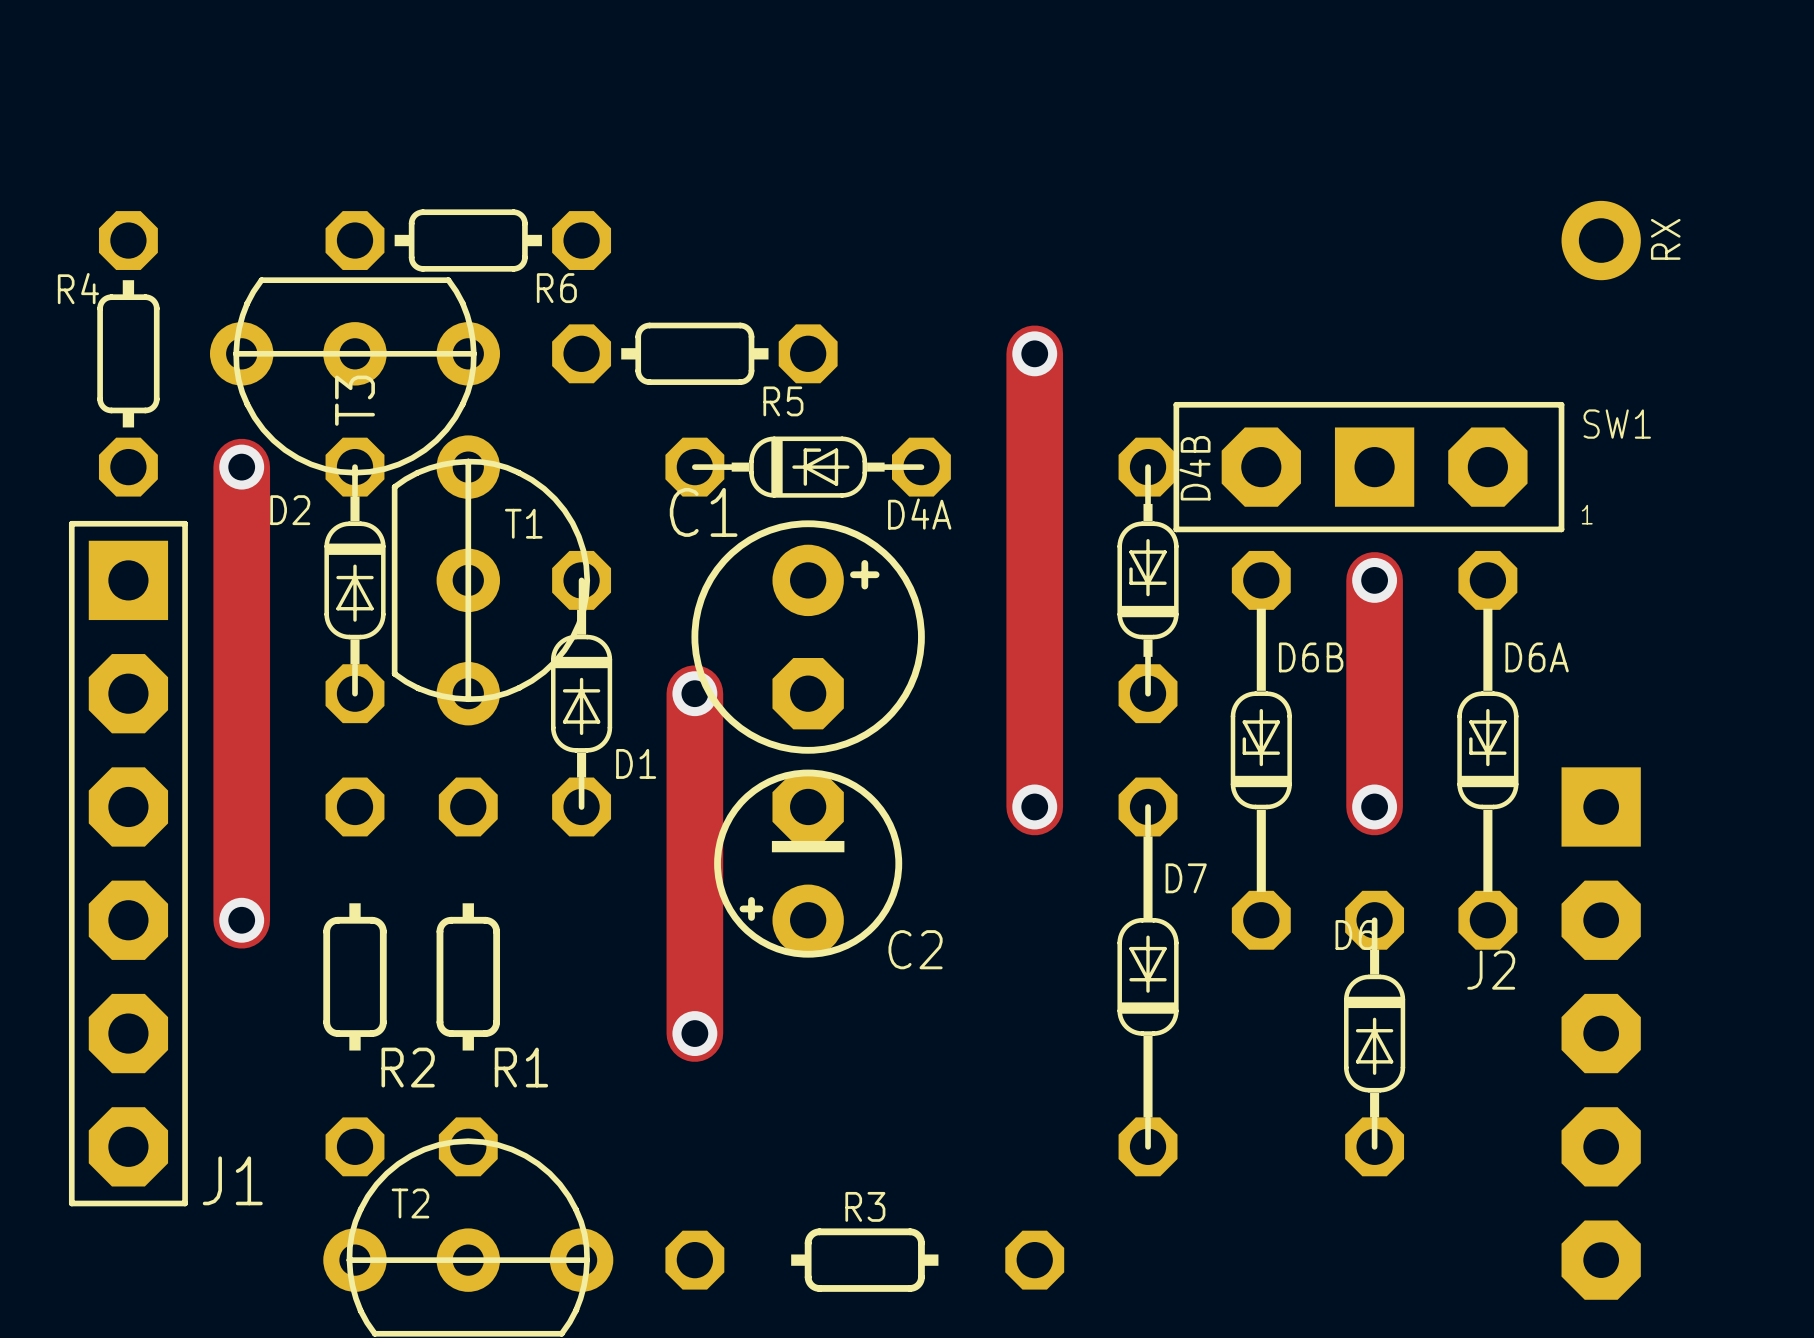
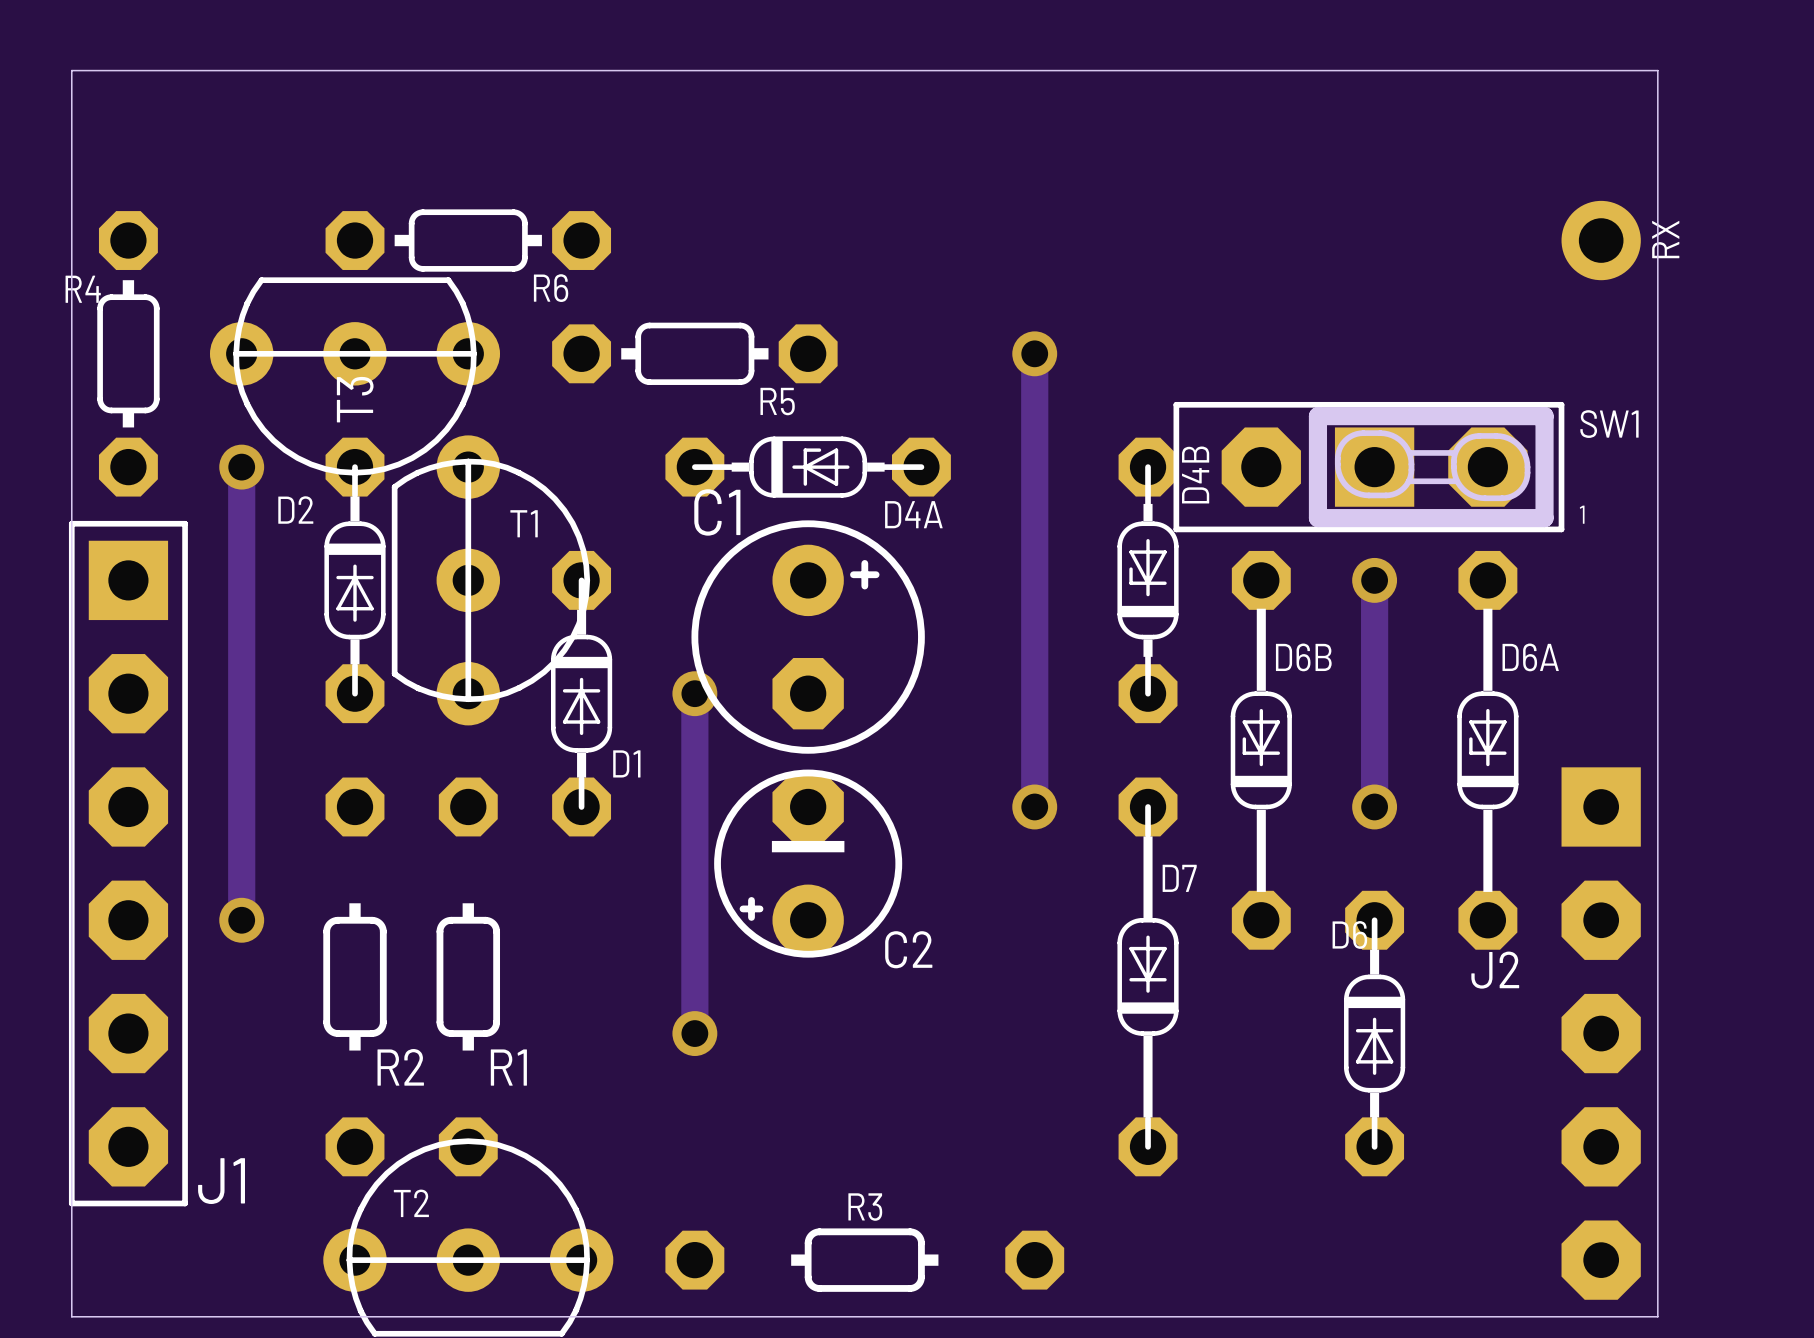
board edge: none -> (71, 70) (1657, 70) (1657, 1316) (71, 1316) (71, 70)
track width: thick (1034, 353) (1034, 806) -> thin (1034, 353) (1034, 806)
SW1 footprint: [1173, 401, 1565, 533] -> [1173, 401, 1565, 533]
track width: thick (241, 467) (241, 920) -> thin (241, 467) (241, 920)
track width: thick (1374, 580) (1374, 806) -> thin (1374, 580) (1374, 806)
track width: thick (694, 693) (694, 1033) -> thin (694, 693) (694, 1033)

